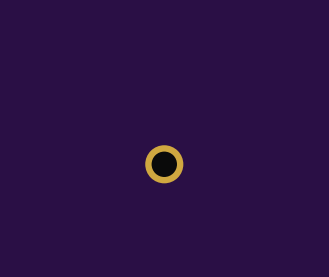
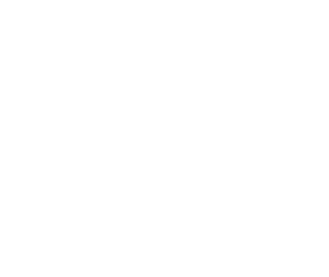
via: (164, 164) -> none

